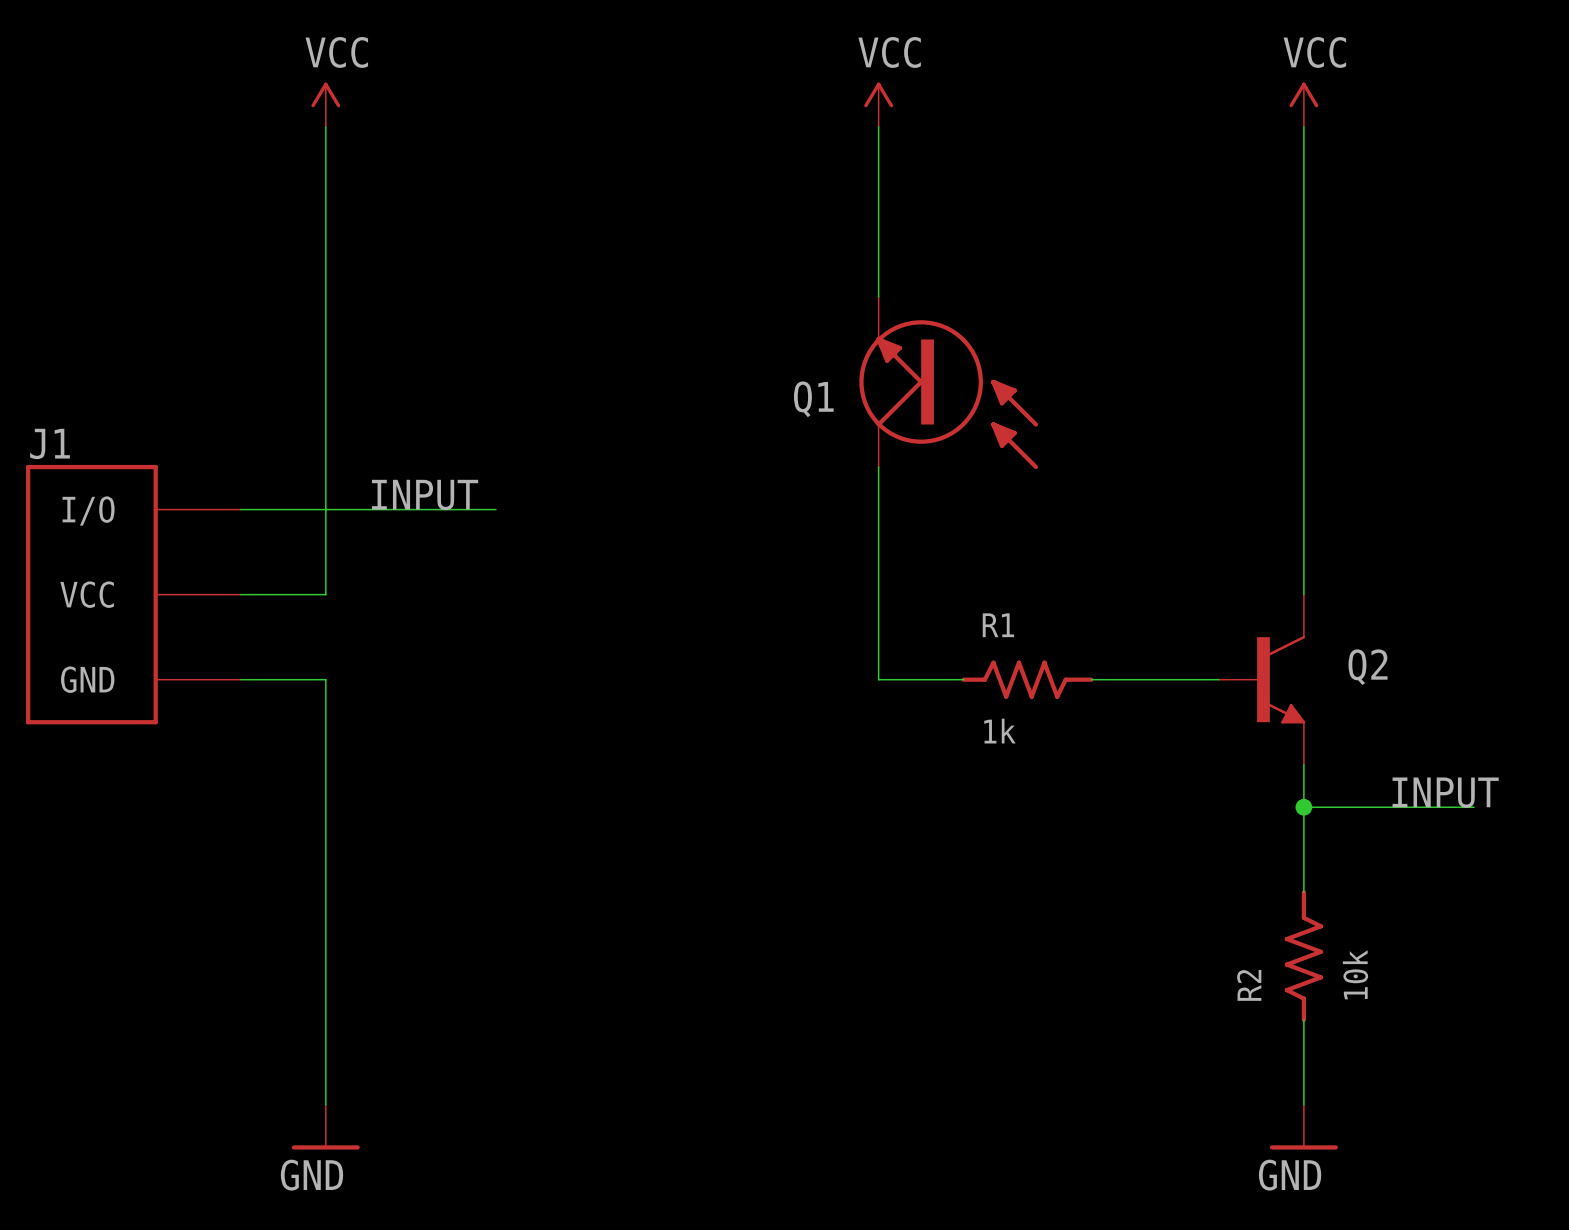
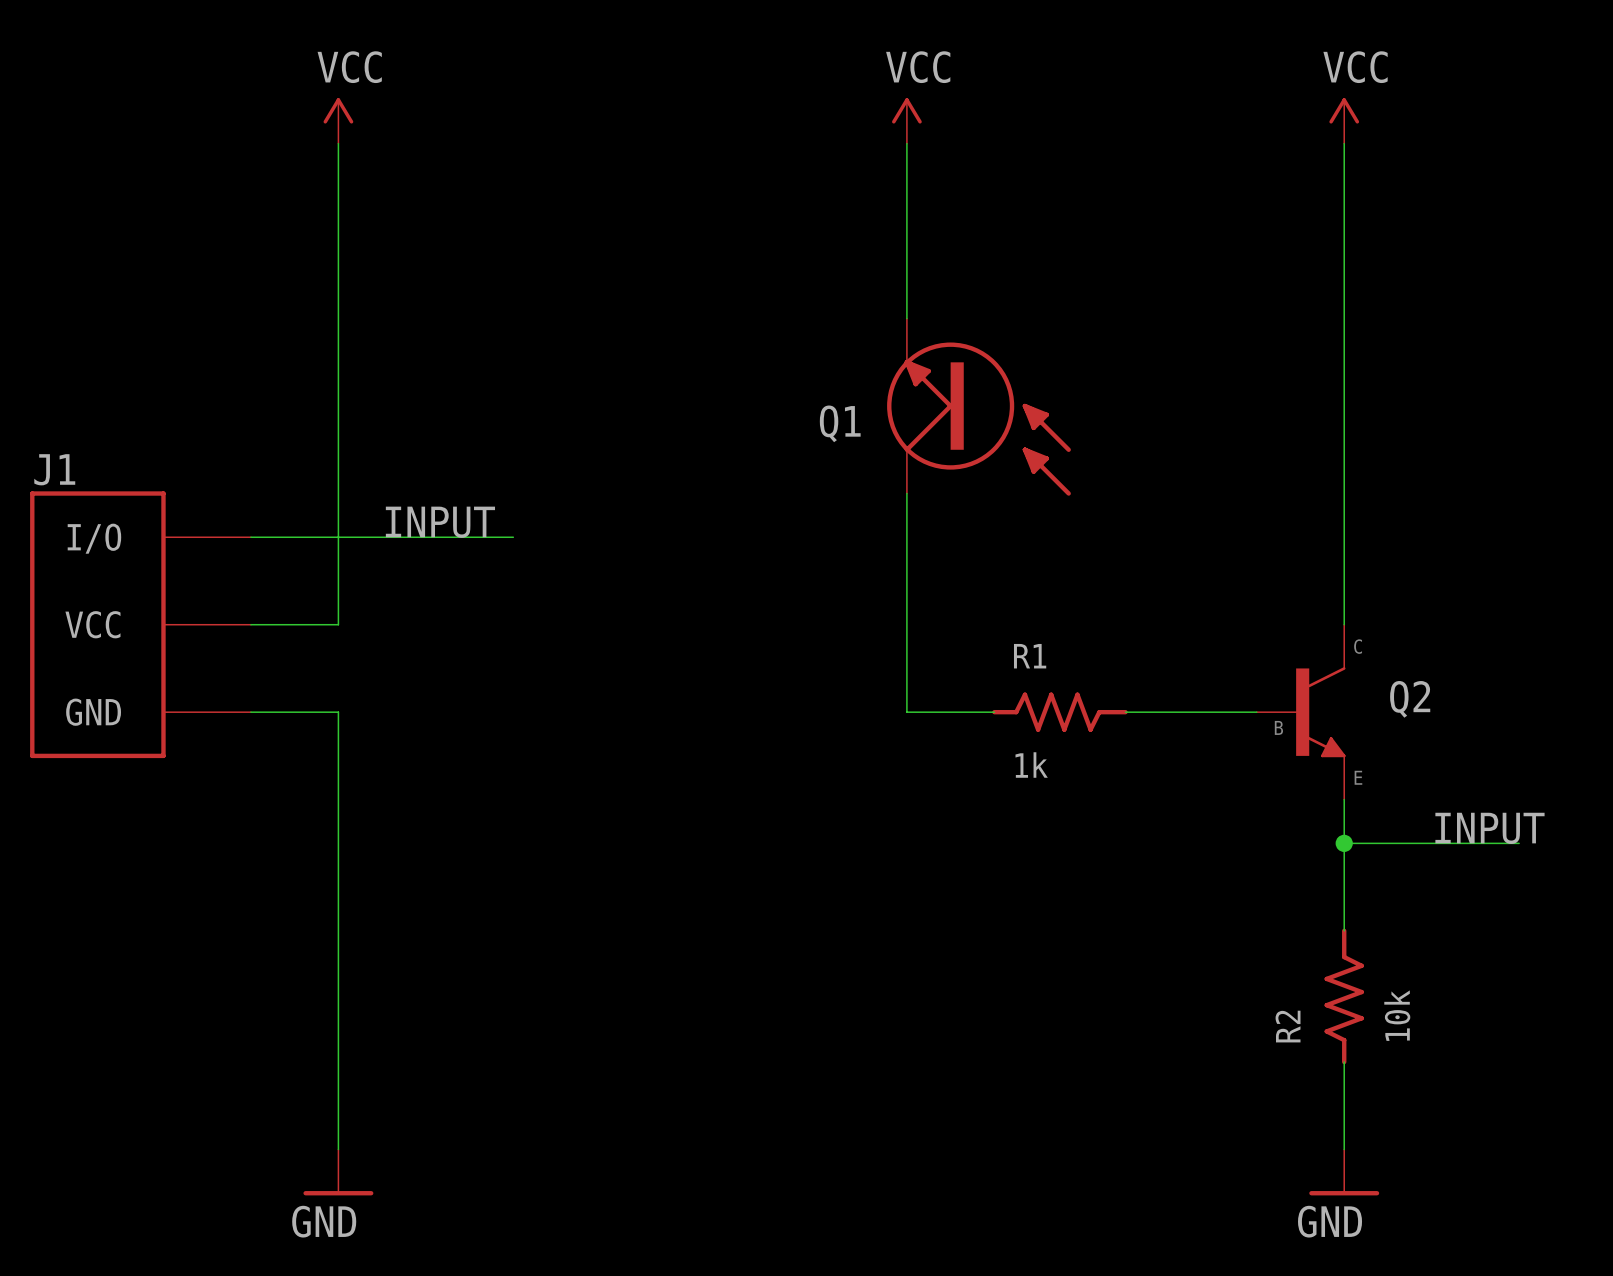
Q2 text: none -> C (1358, 646)
Q2 text: none -> B (1278, 727)
Q2 text: none -> E (1358, 777)

